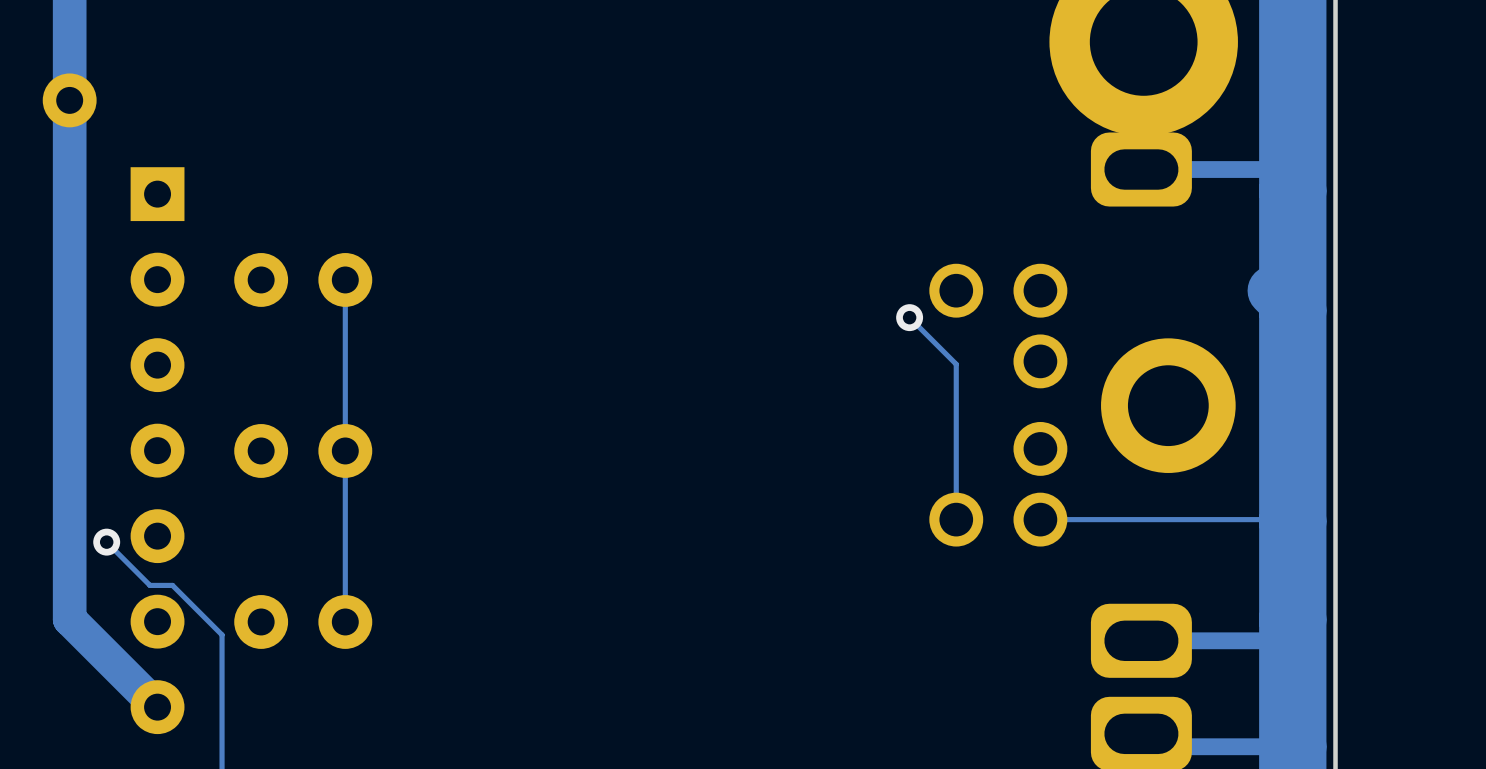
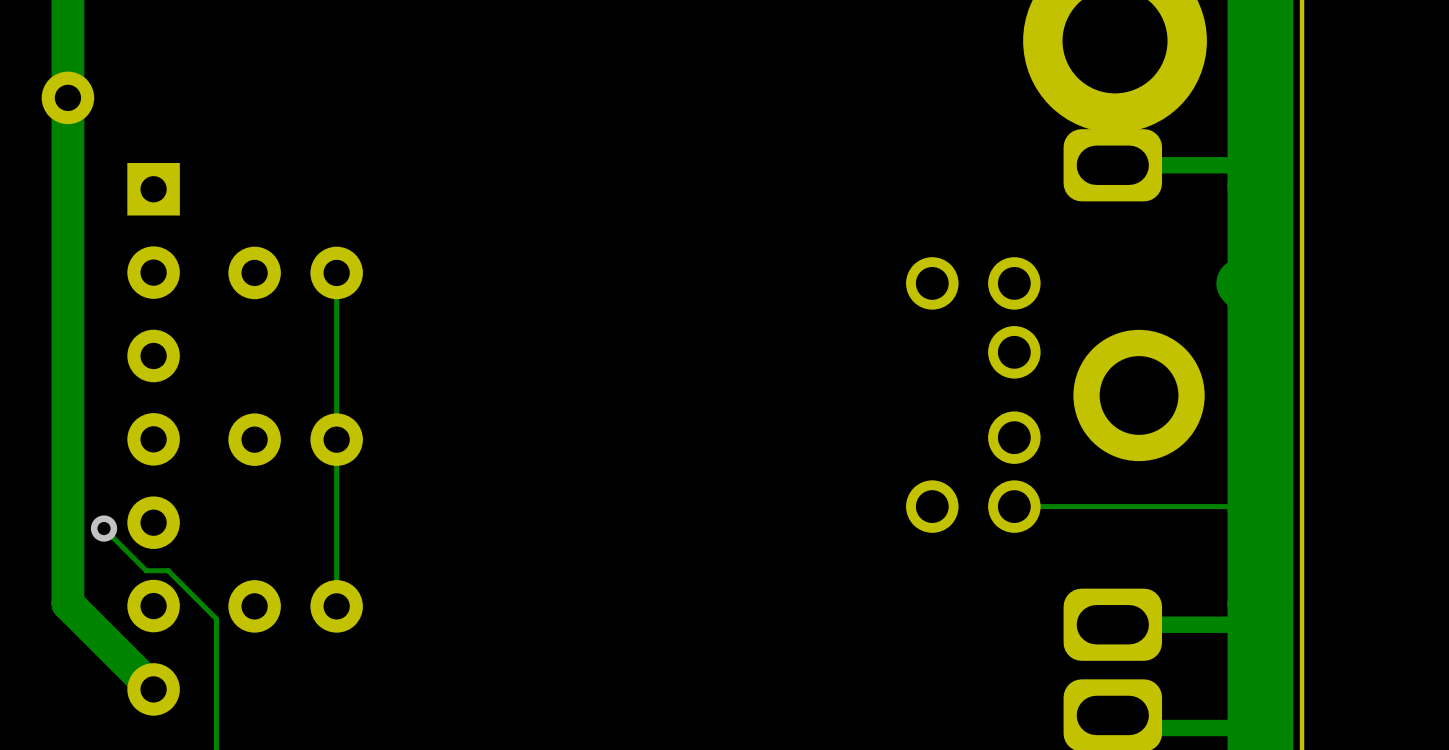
track: (909, 317) (956, 364) (956, 519) -> none
via: (909, 317) -> none

